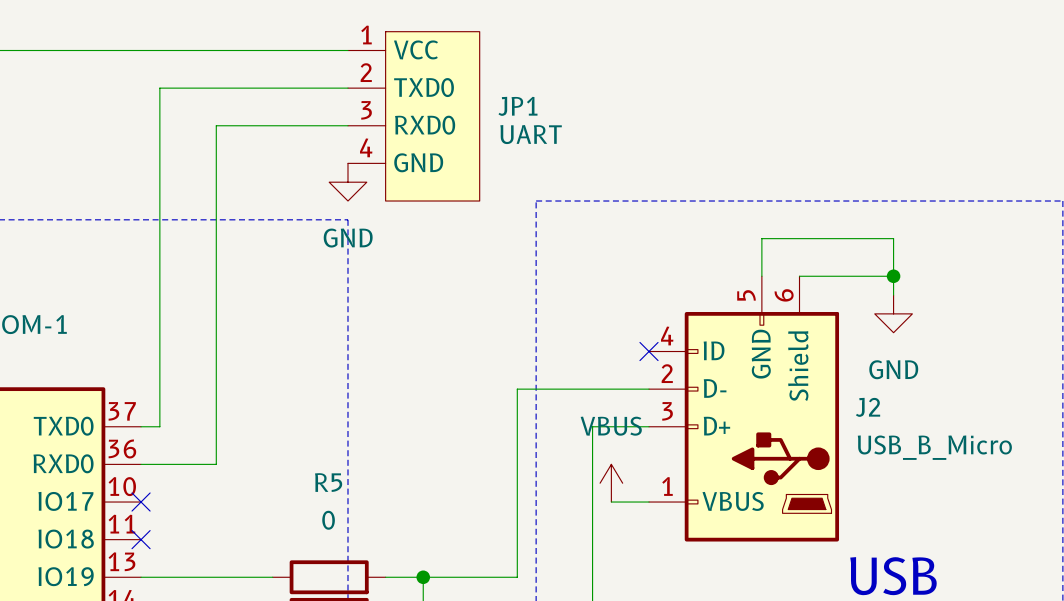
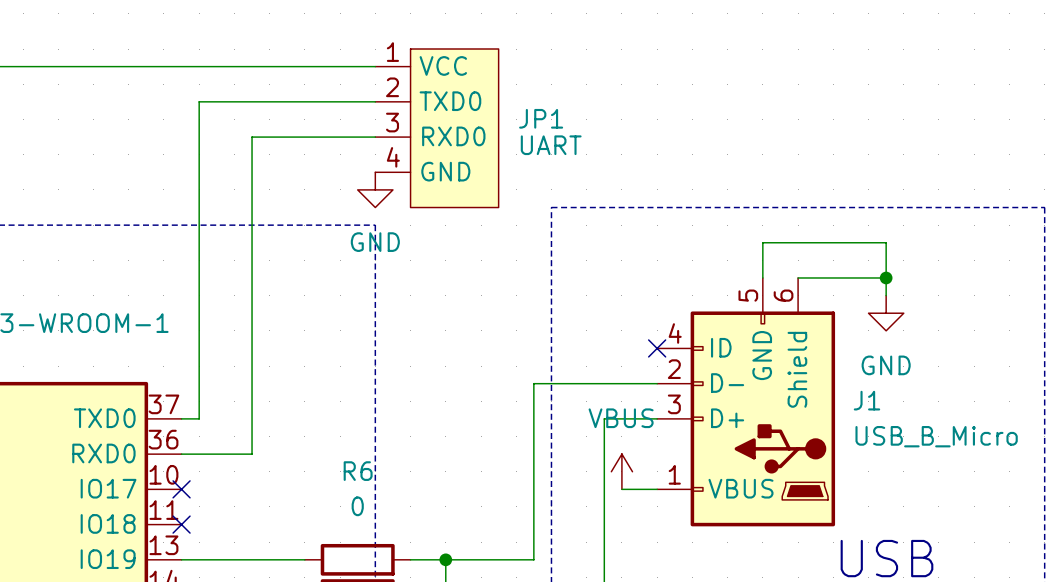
J2 name: J2 (868, 407) -> J1 (866, 400)
R5 name: R5 (328, 482) -> R6 (358, 471)

